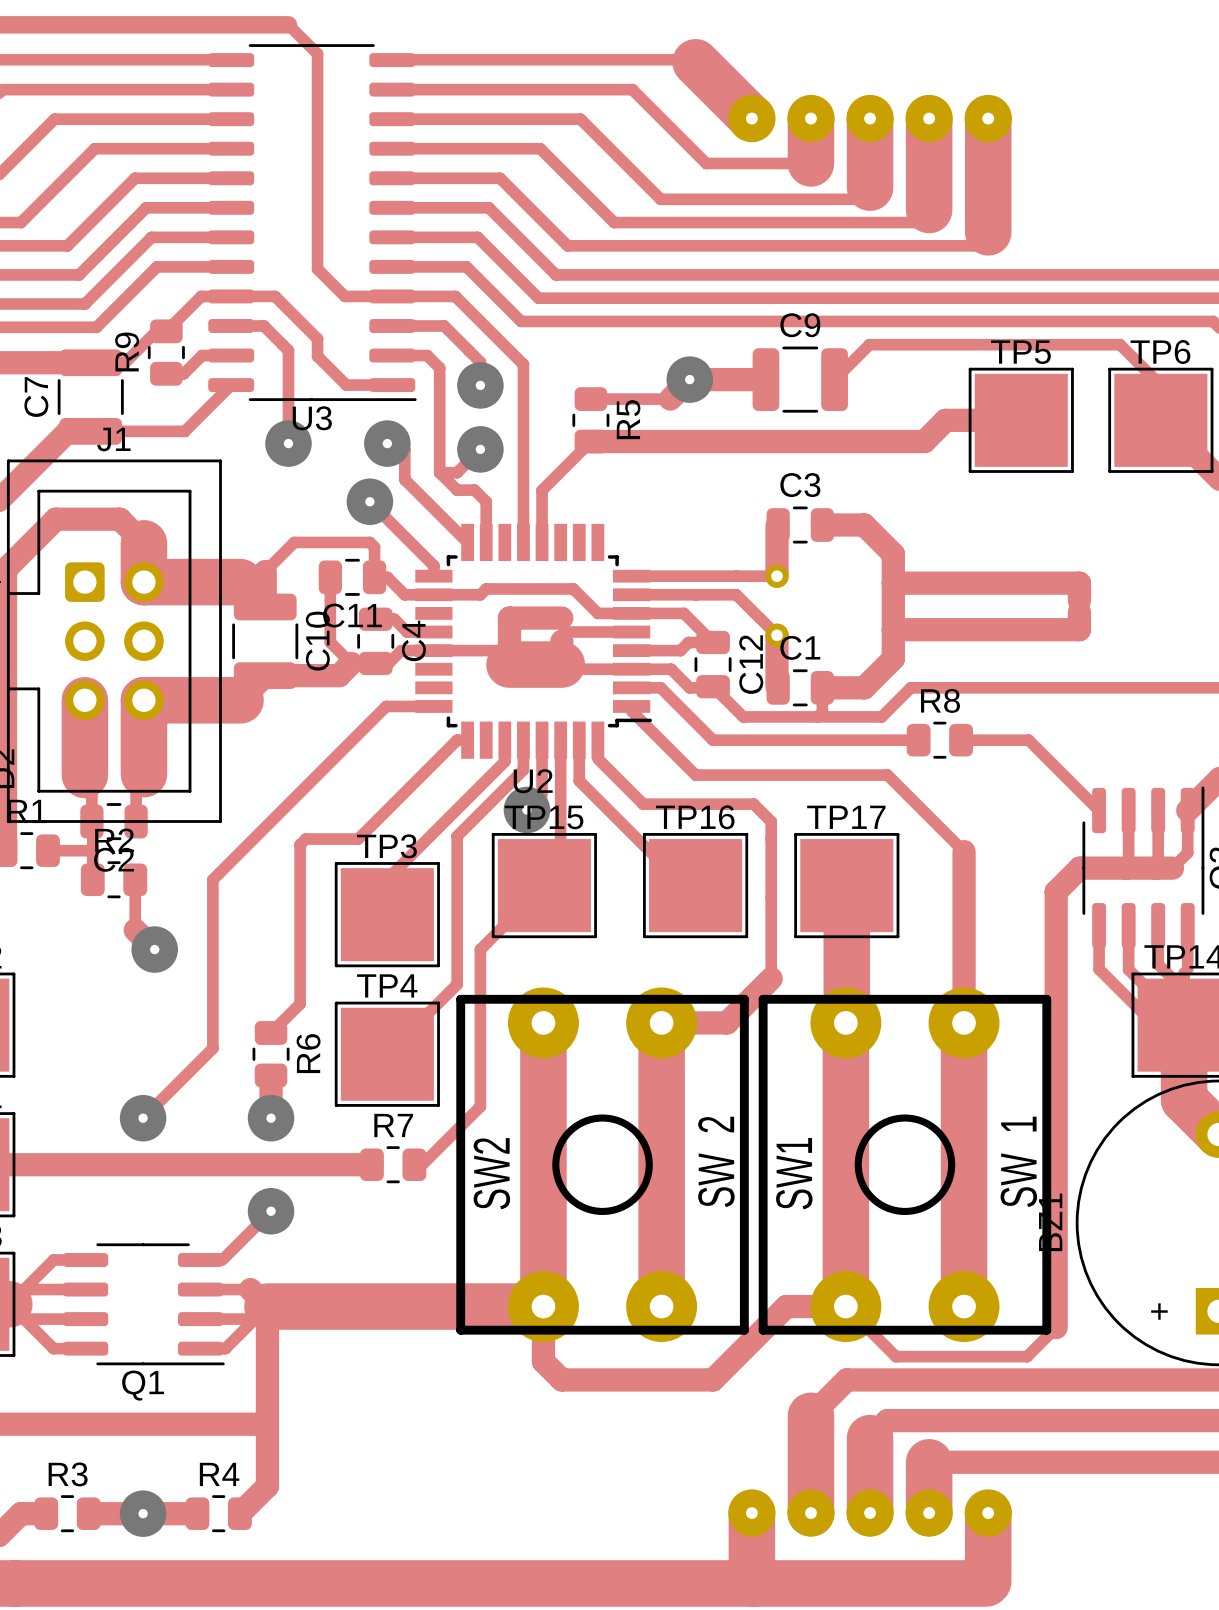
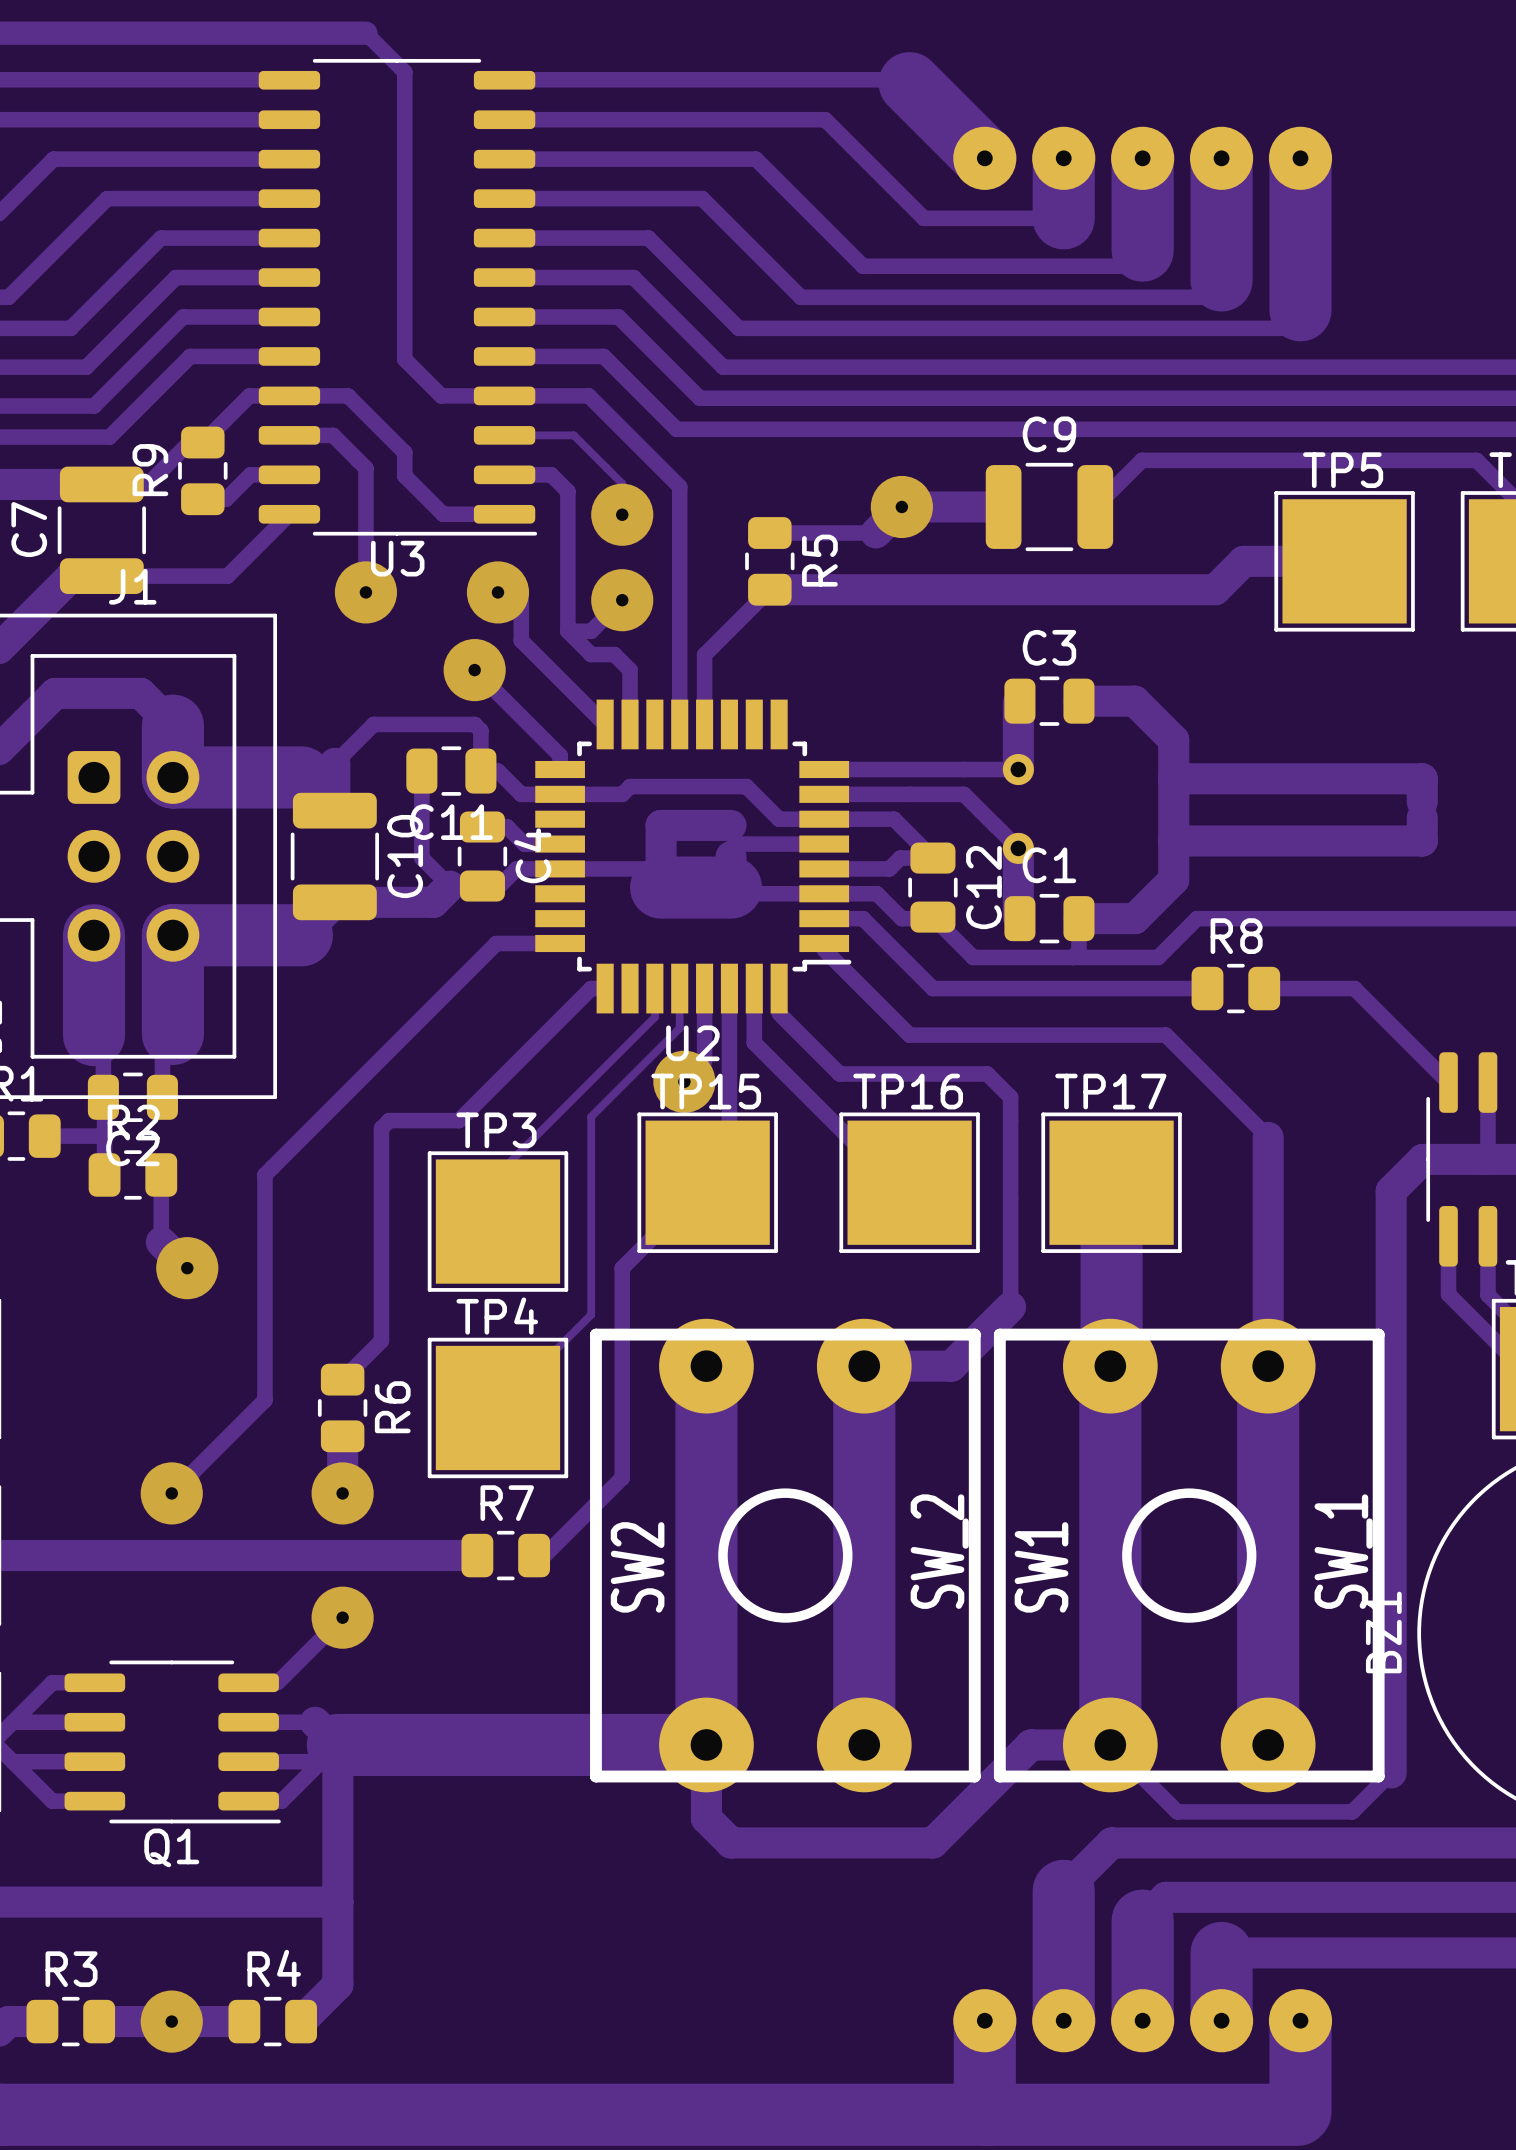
track width: thick (392, 325) (444, 325) (480, 362) (480, 385) -> thin (504, 435) (573, 435) (622, 483) (622, 514)
track width: thick (504, 740) (504, 761) (387, 879) -> thin (654, 988) (654, 1017) (497, 1174)
track width: thick (523, 740) (523, 769) (457, 836) (457, 984) (387, 1054) -> thin (679, 988) (679, 1028) (591, 1116) (591, 1314) (497, 1407)

